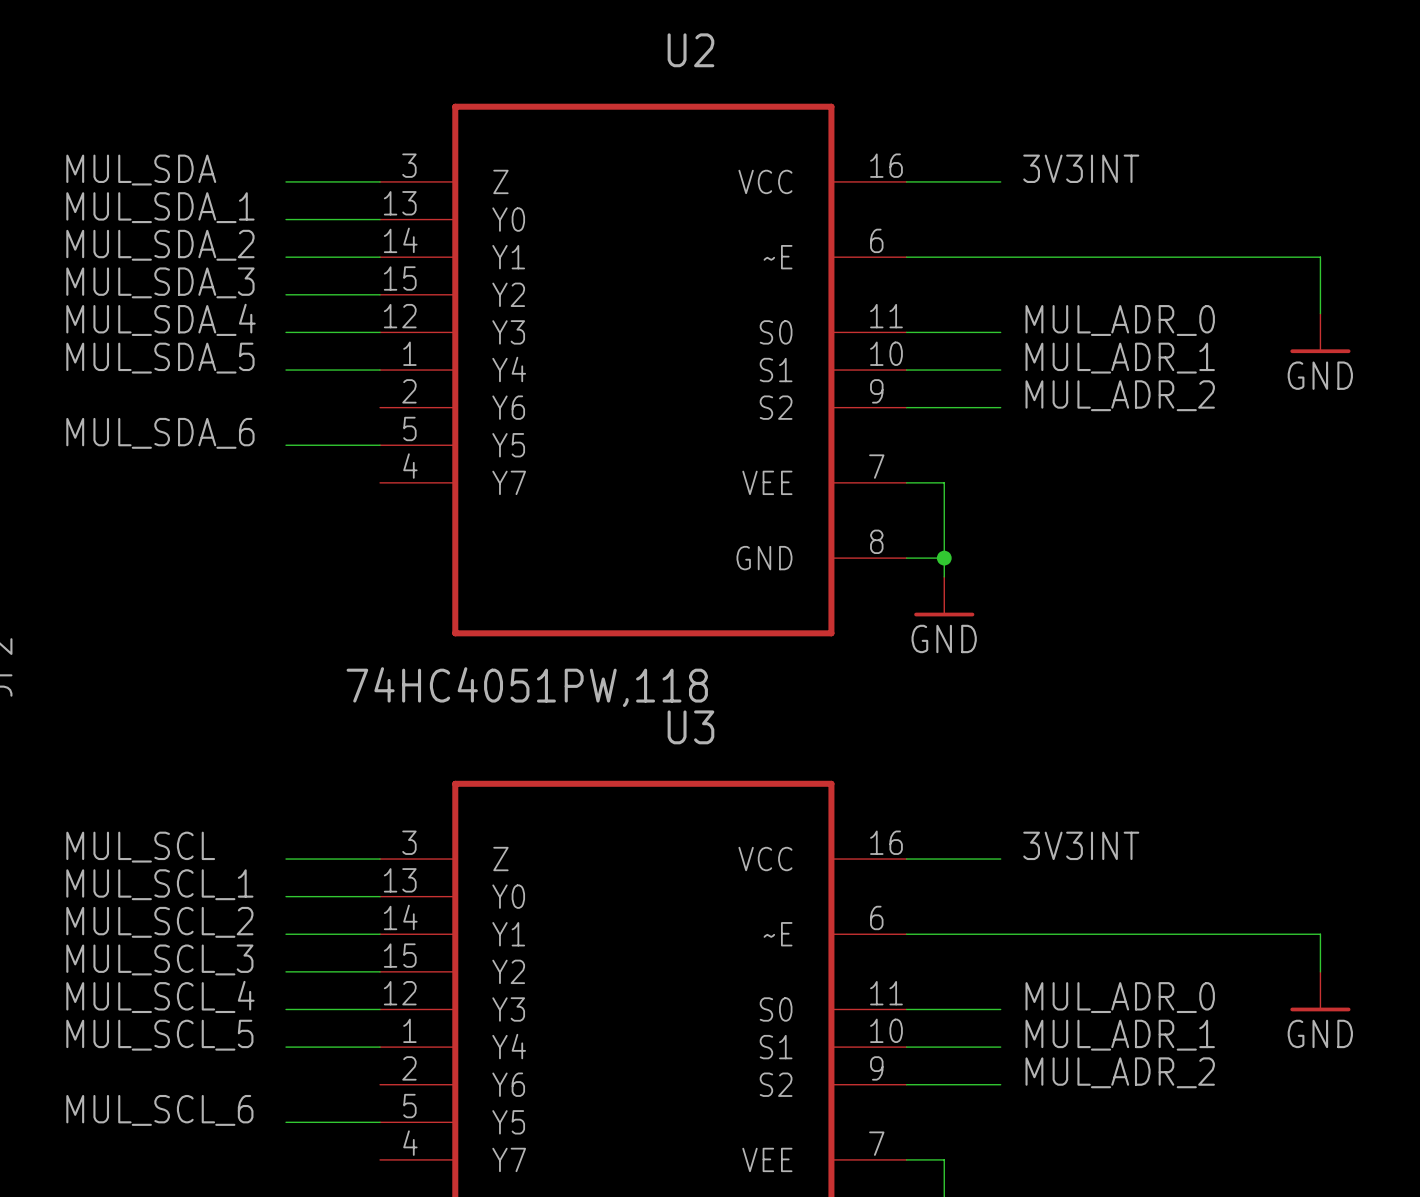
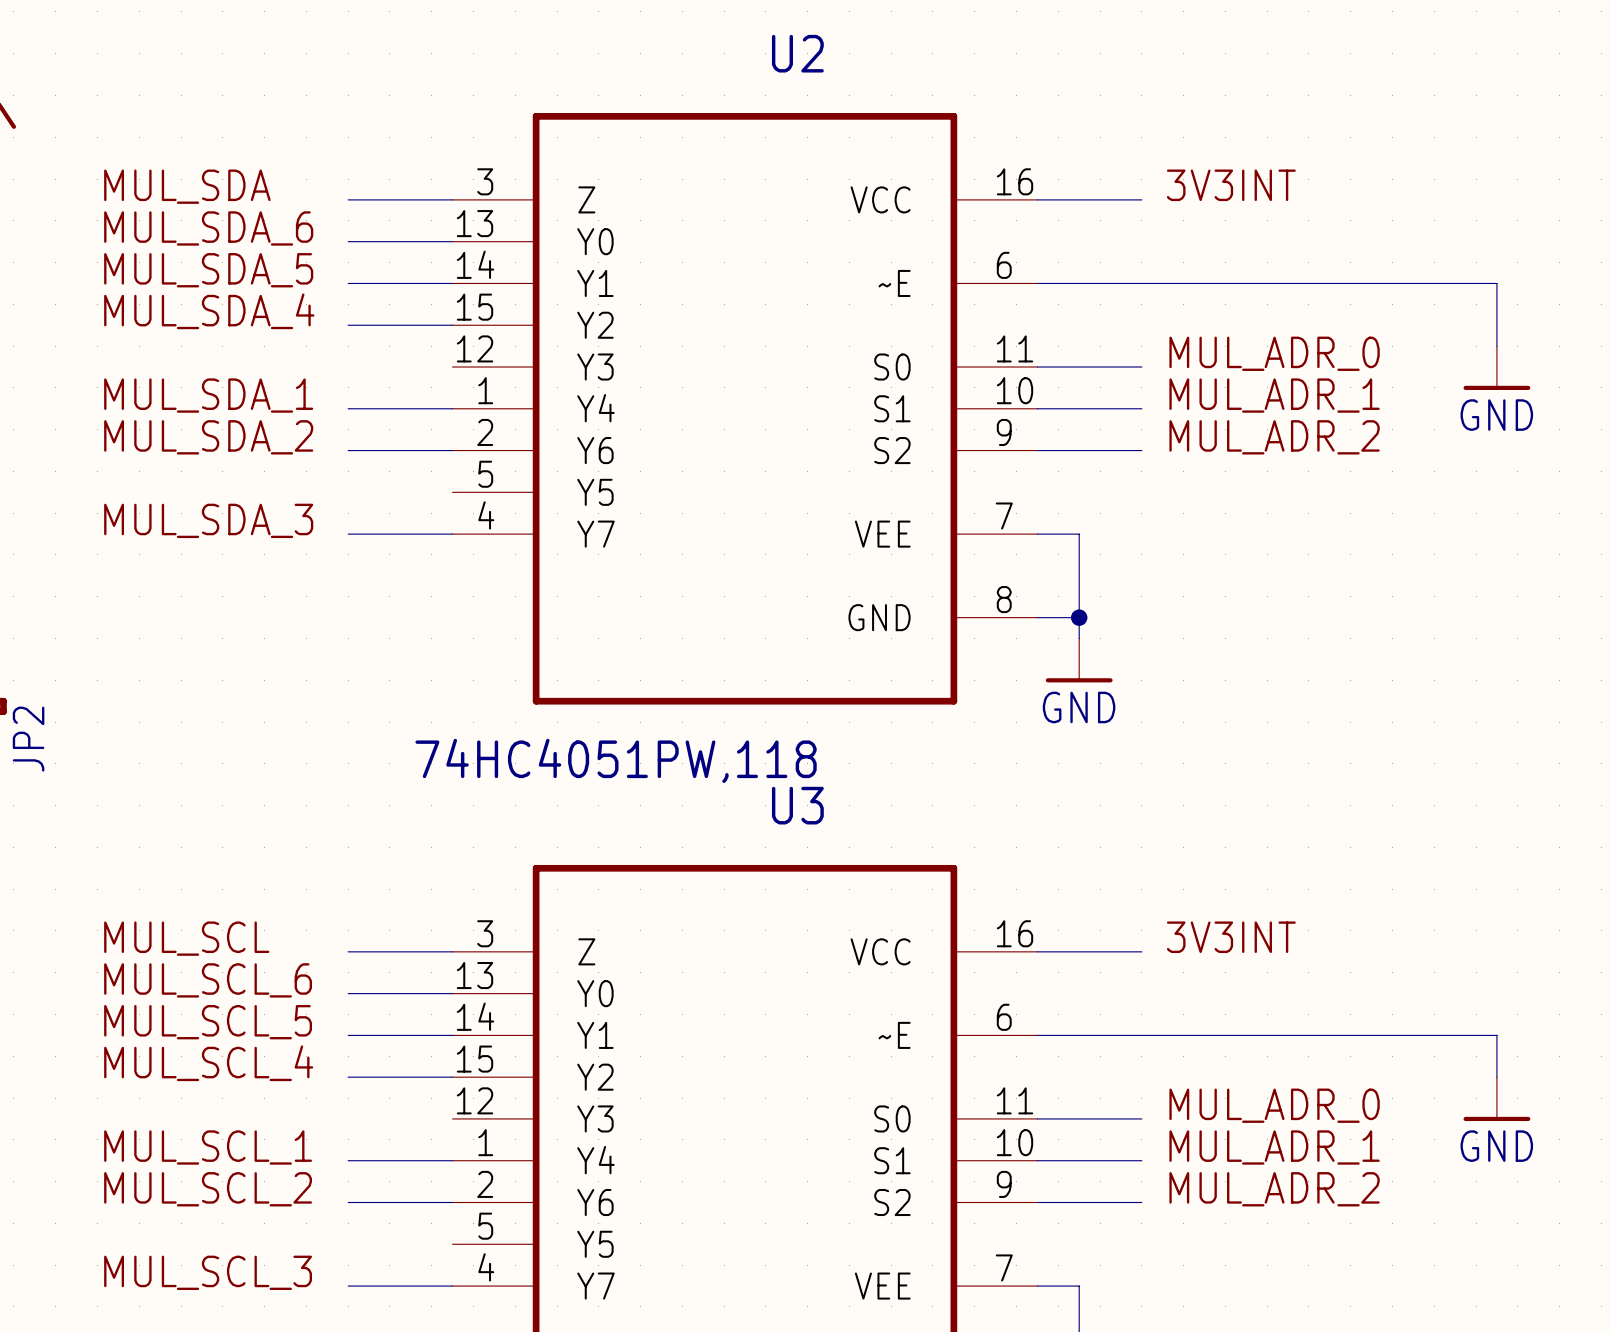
label: MUL_SDA_1 (160, 207) -> MUL_SDA_6 (208, 228)
label: MUL_SDA_2 (160, 245) -> MUL_SDA_5 (208, 270)
label: MUL_SDA_3 (160, 282) -> MUL_SDA_4 (209, 311)
label: MUL_SDA_4 (161, 319) -> none
wire: (286, 332) (380, 332) -> (348, 534) (452, 534)
label: MUL_SDA_5 (160, 358) -> MUL_SDA_1 (208, 395)
label: none -> MUL_SDA_2 (208, 437)
label: MUL_SDA_6 (160, 433) -> none
wire: (286, 445) (380, 445) -> (348, 450) (452, 450)
label: none -> MUL_SDA_3 (208, 520)
label: MUL_SCL_1 (159, 884) -> MUL_SCL_6 (208, 980)
label: MUL_SCL_2 (159, 922) -> MUL_SCL_5 (208, 1022)
label: MUL_SCL_3 (159, 959) -> MUL_SCL_4 (208, 1063)
label: MUL_SCL_4 (160, 996) -> none
wire: (286, 1009) (380, 1009) -> (348, 1202) (452, 1202)
label: MUL_SCL_5 (159, 1035) -> MUL_SCL_1 (208, 1147)
label: none -> MUL_SCL_2 (208, 1189)
label: MUL_SCL_6 (159, 1110) -> none
wire: (286, 1122) (380, 1122) -> (348, 1286) (452, 1286)
label: none -> MUL_SCL_3 (208, 1272)

